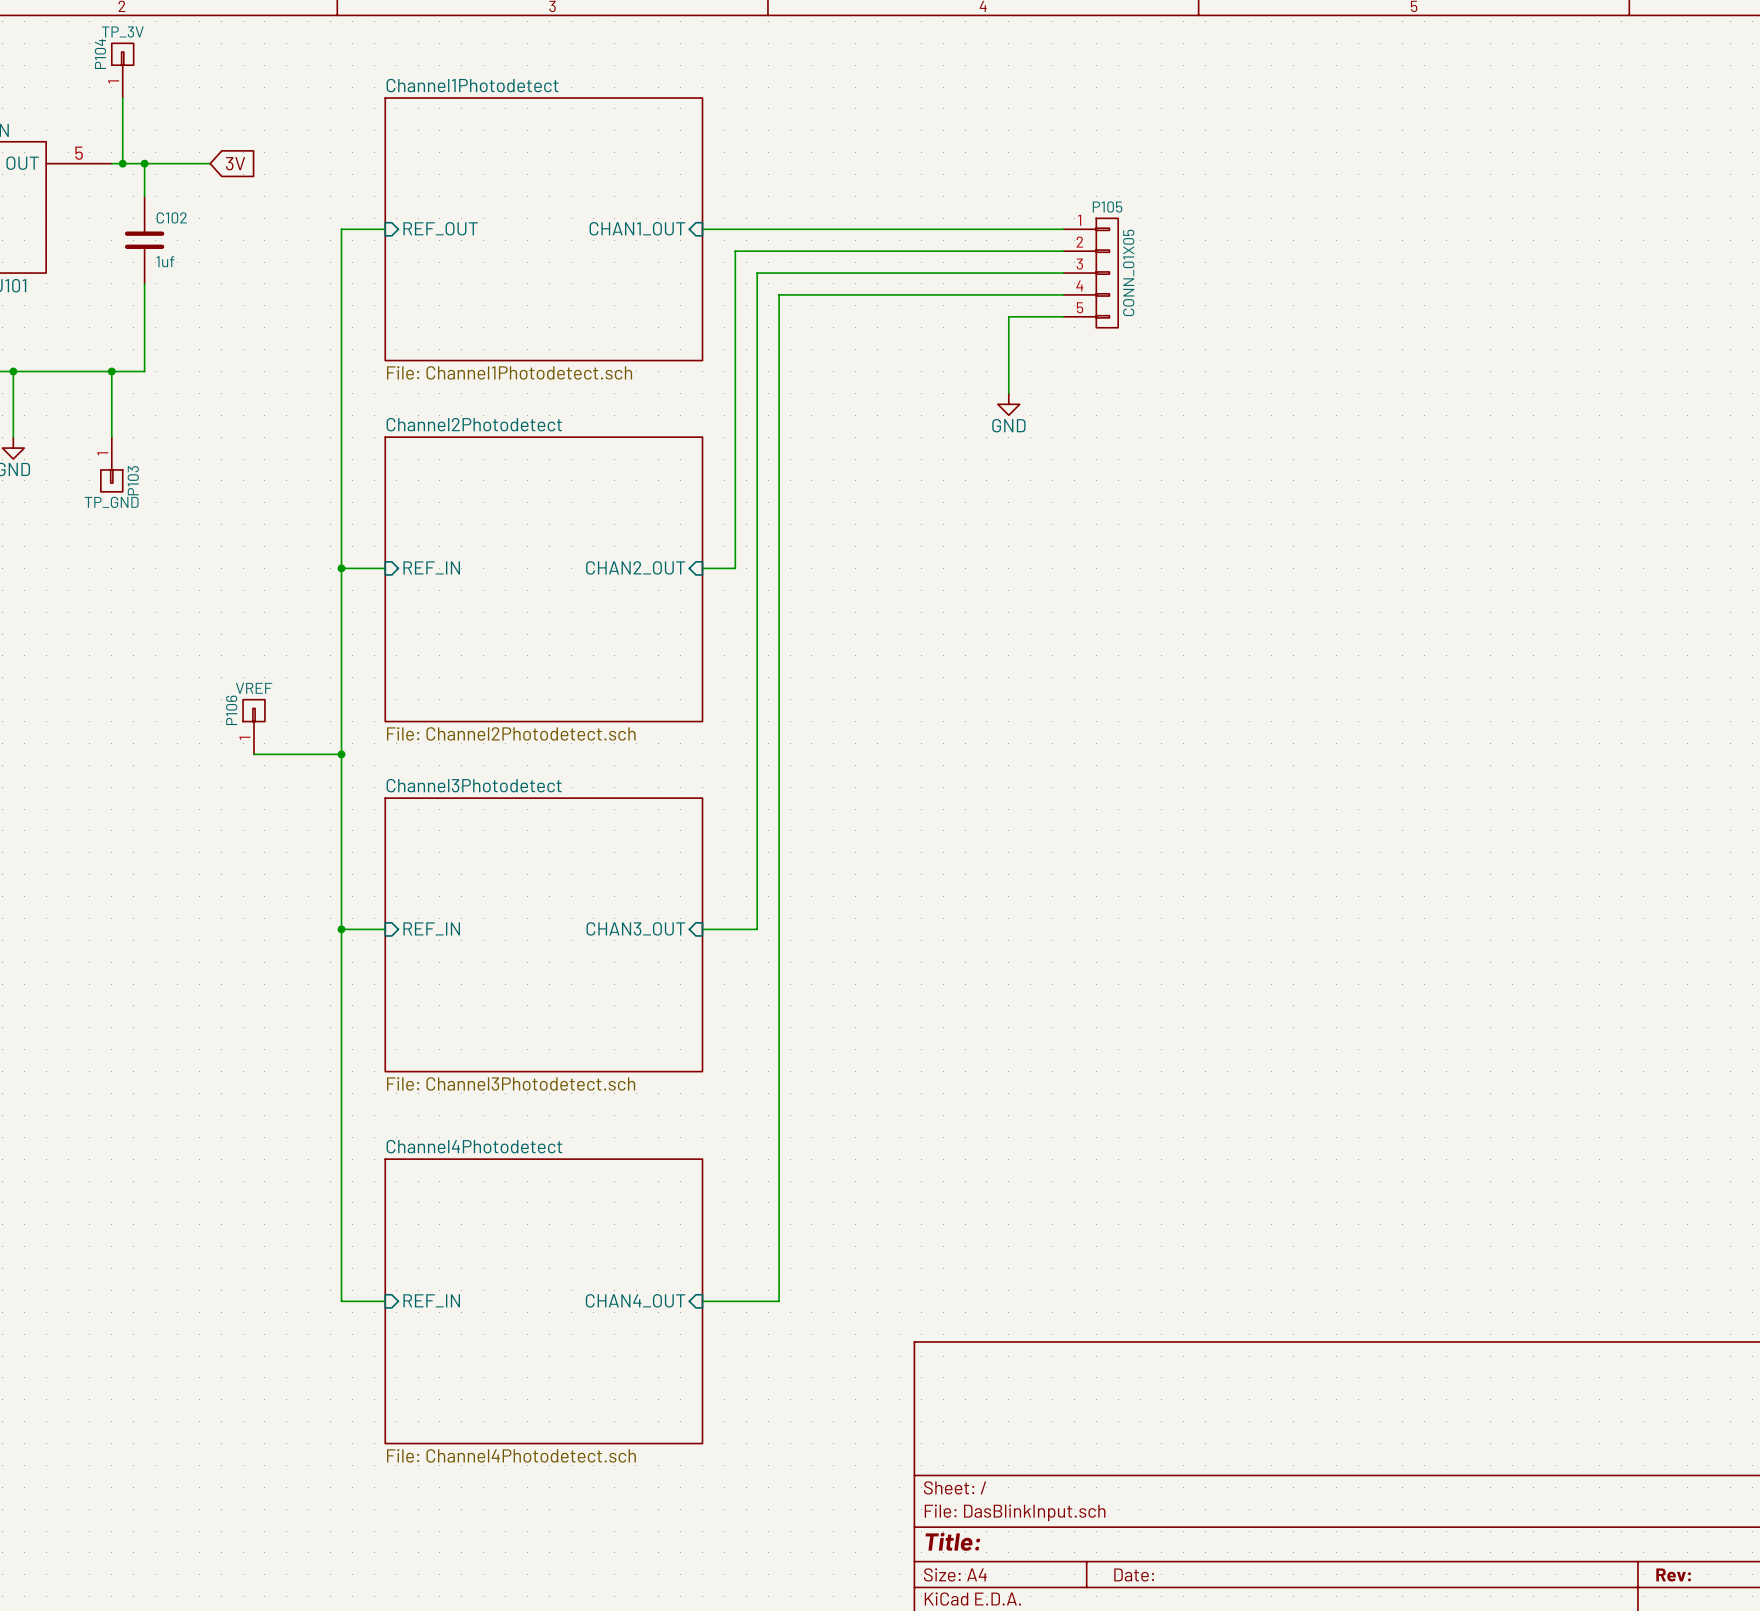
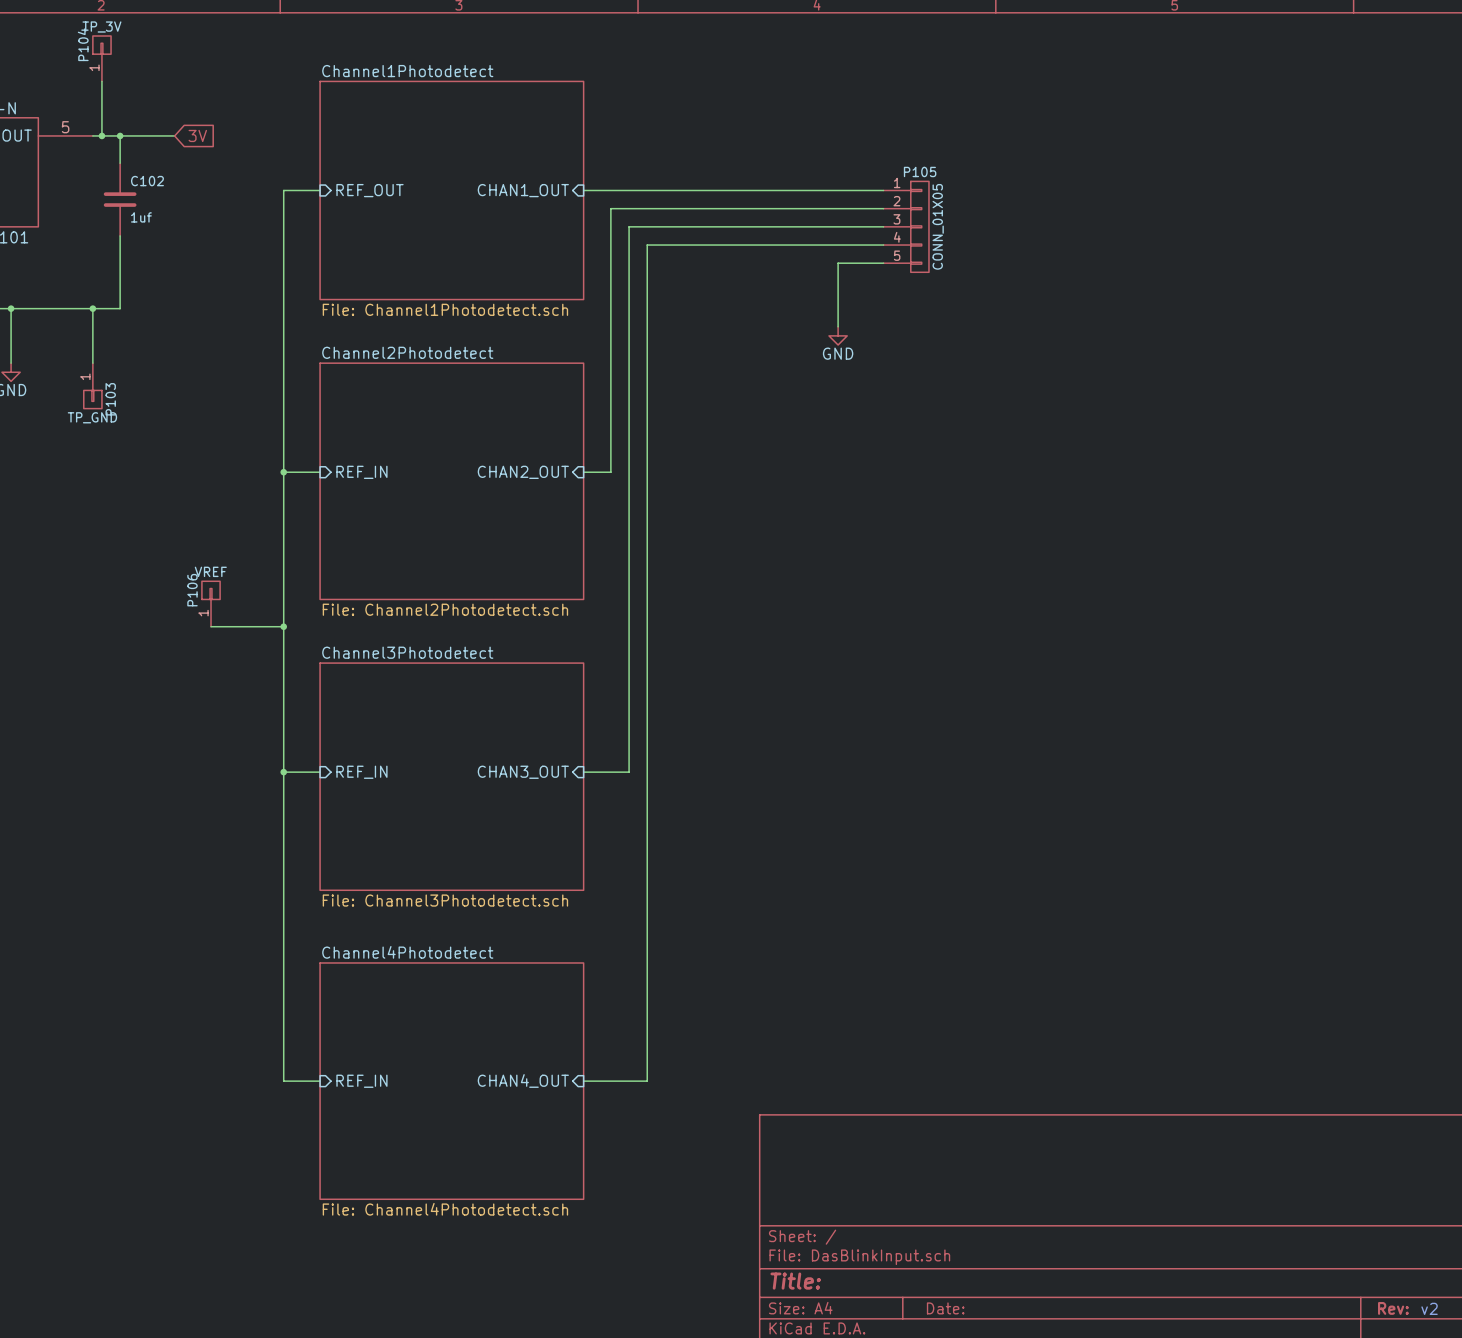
text: none -> v2 (1429, 1308)

